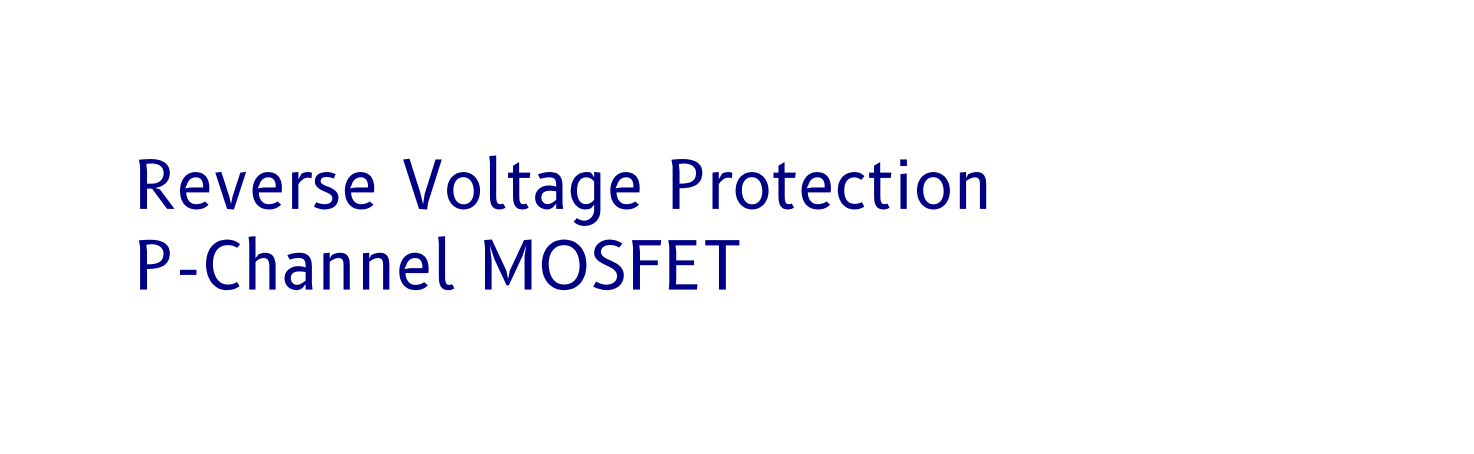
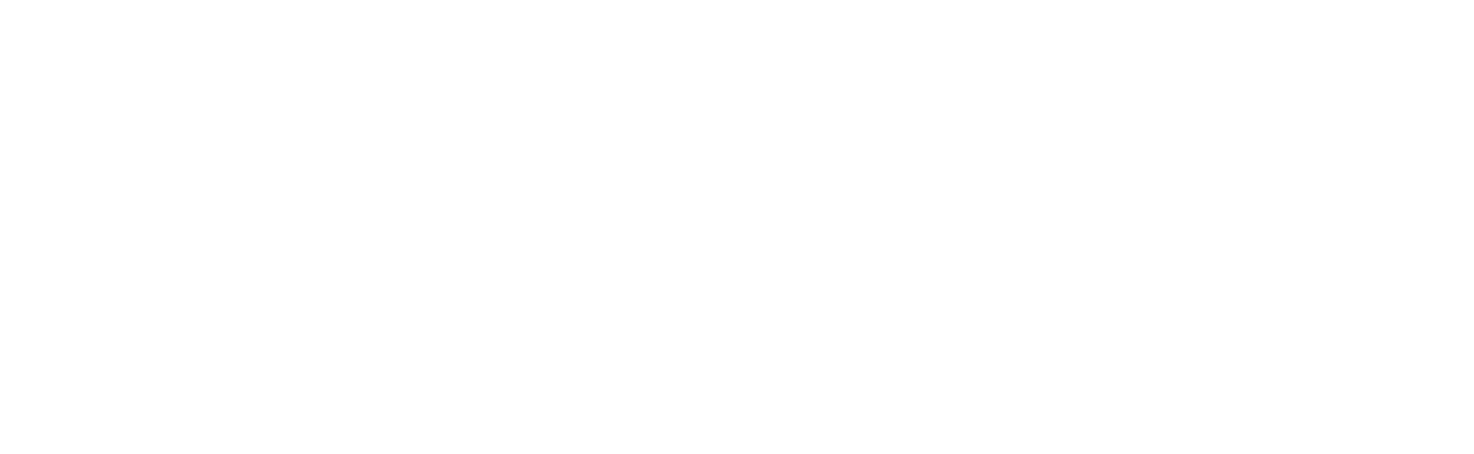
text: Reverse Voltage Protection (562, 190) -> none
text: P-Channel MOSFET (439, 263) -> none

